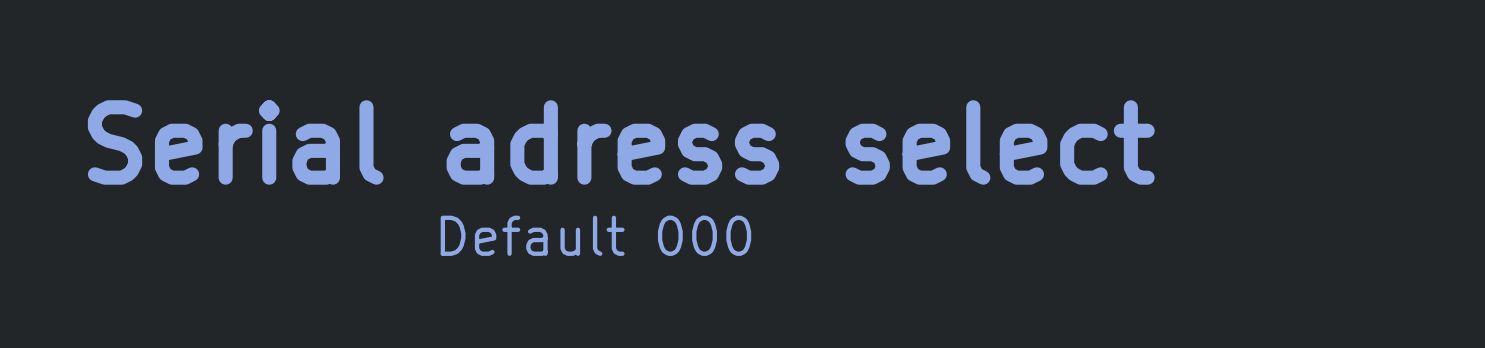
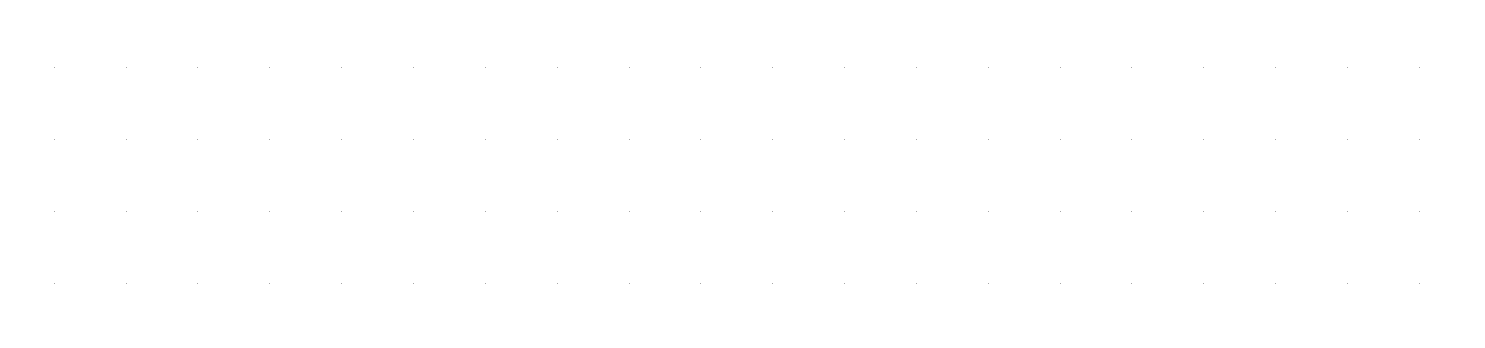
text: Serial adress select (621, 142) -> none
text: Default 000 (595, 235) -> none

